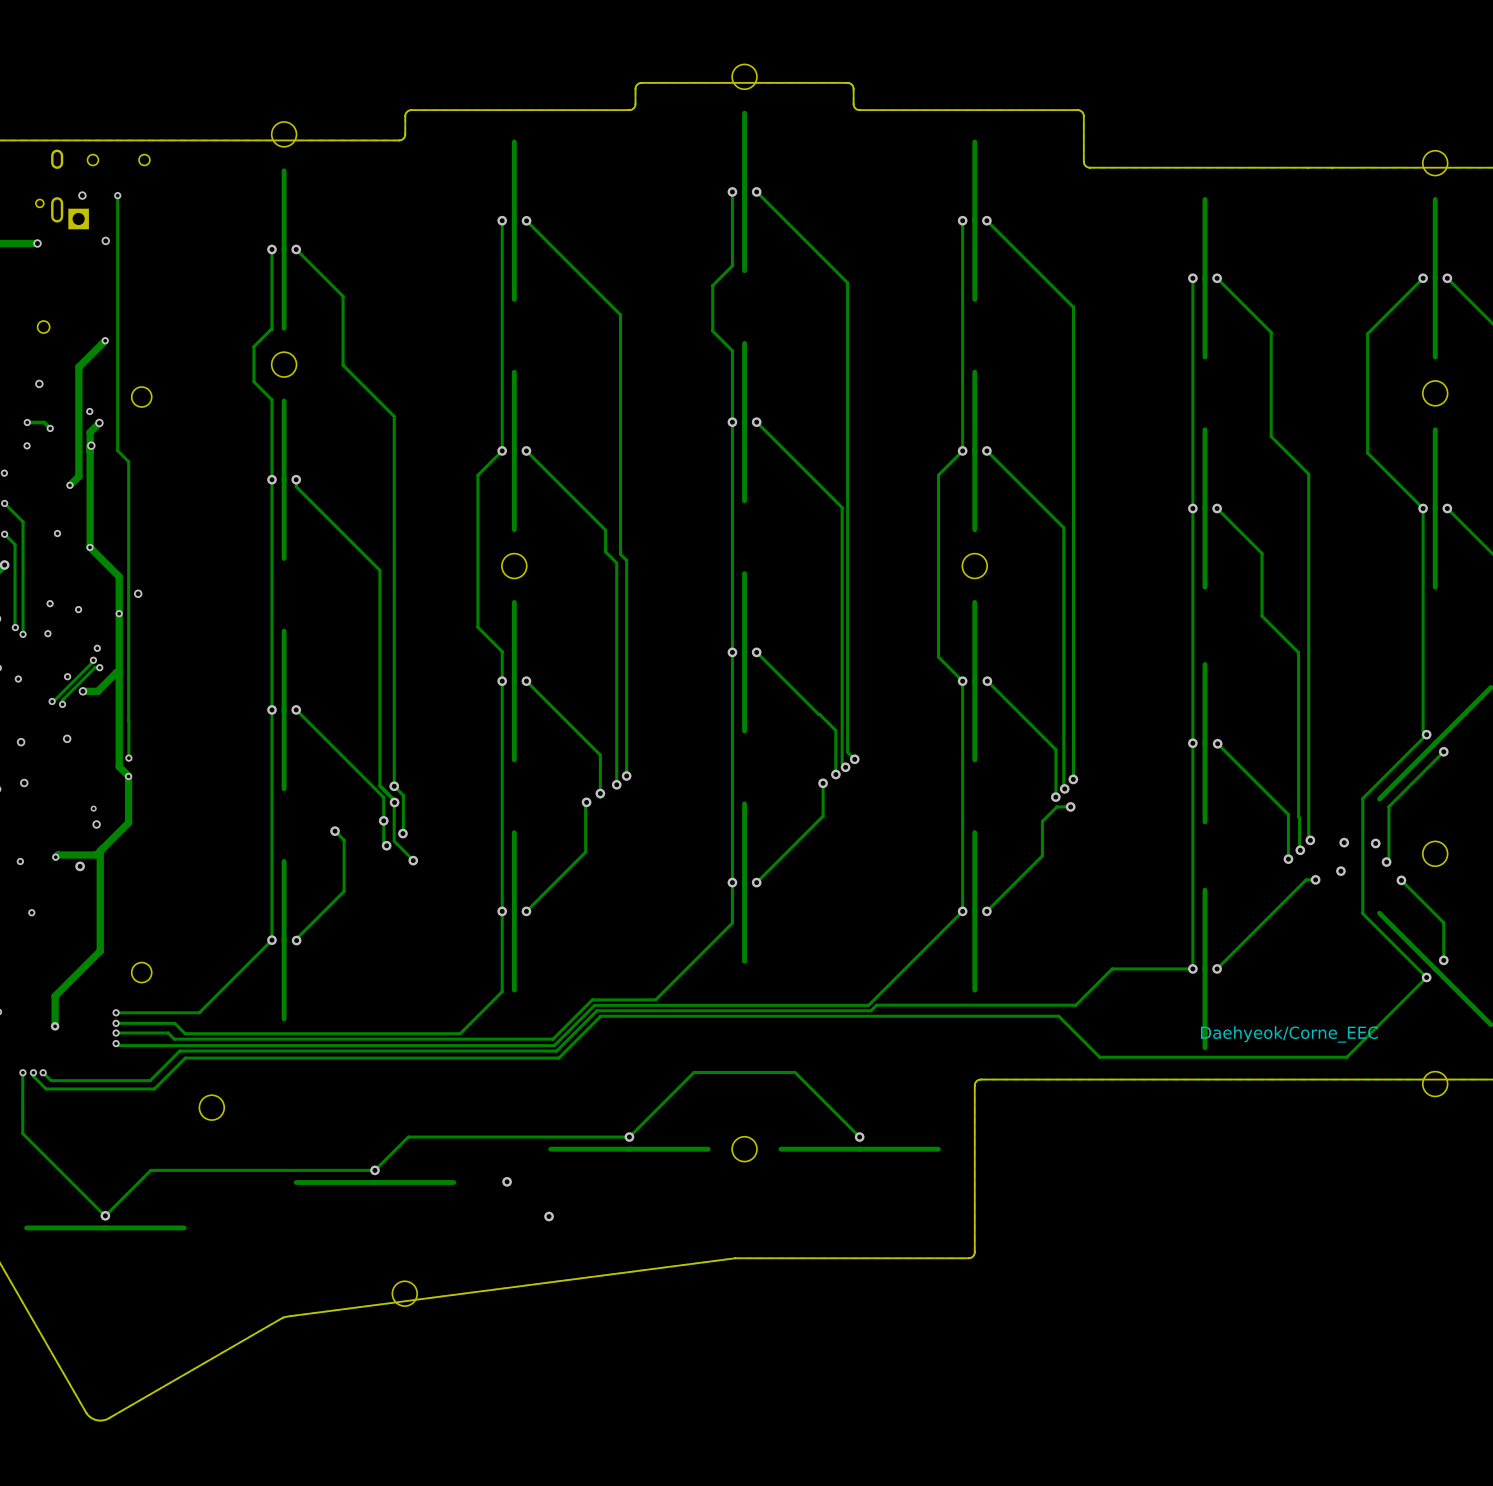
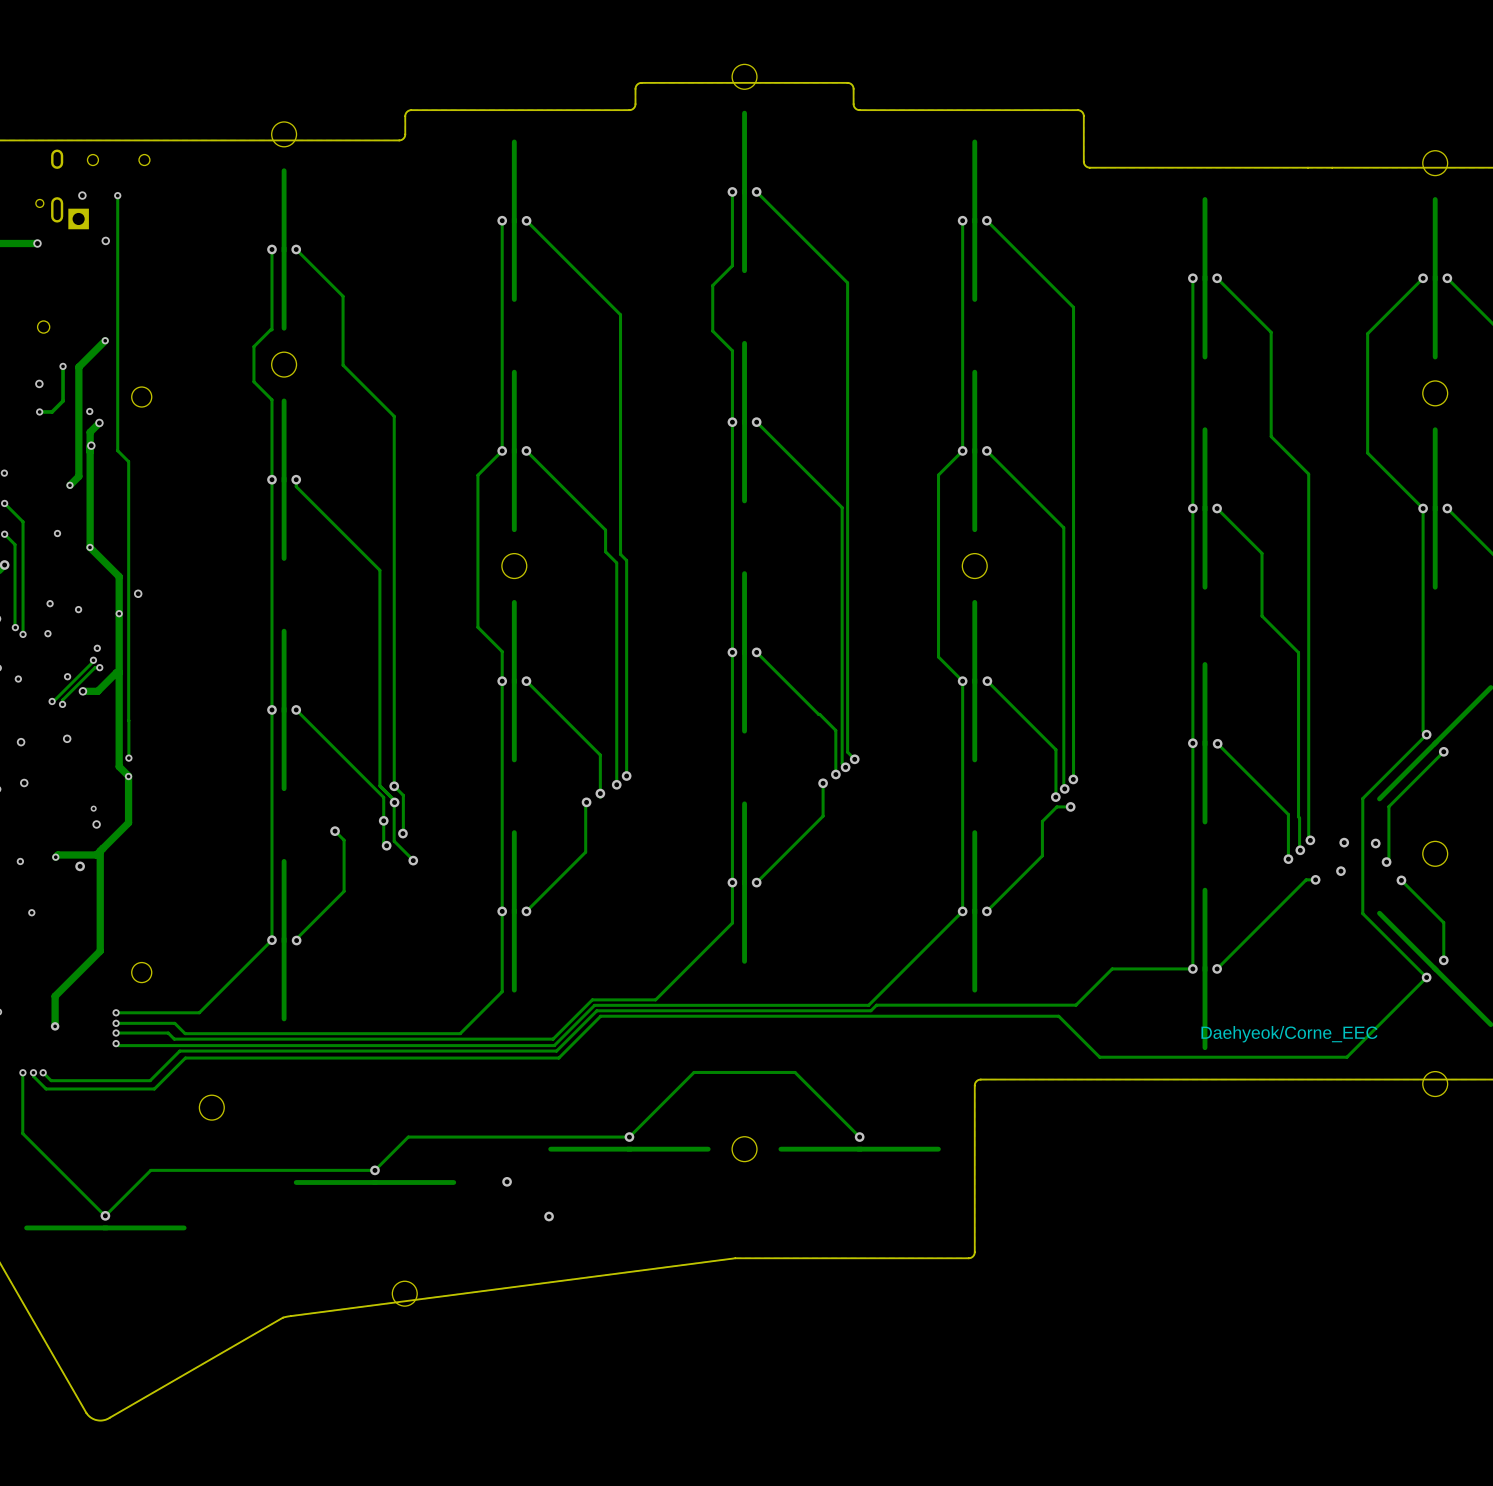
track: none -> (63, 366) (63, 401) (52, 411) (39, 411)
via: none -> (63, 366)
via: none -> (39, 411)
track: (27, 422) (44, 422) (50, 428) -> none
via: (27, 422) -> none
via: (50, 428) -> none
via: (27, 445) -> none

